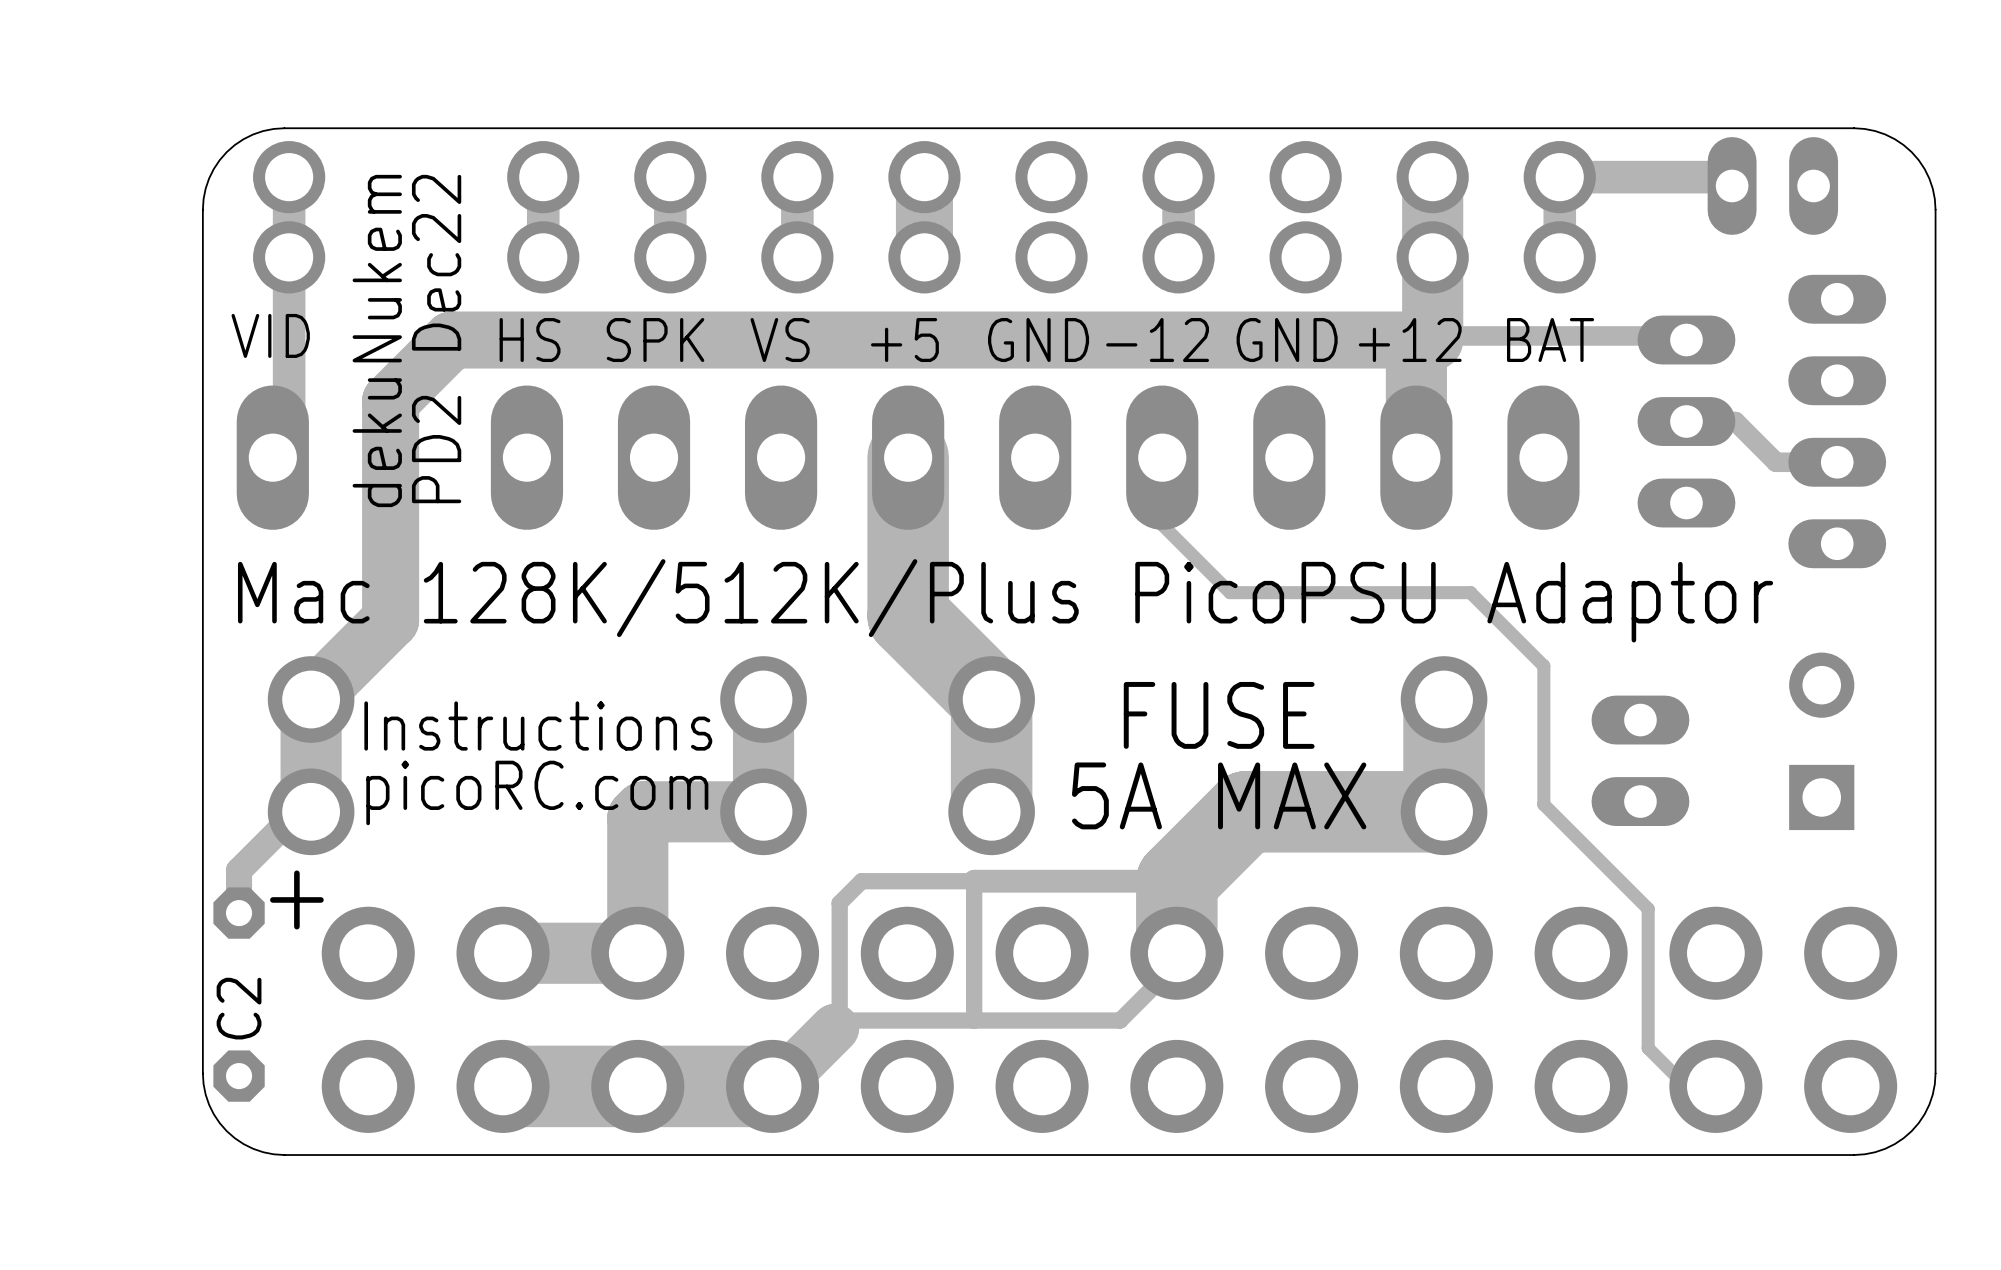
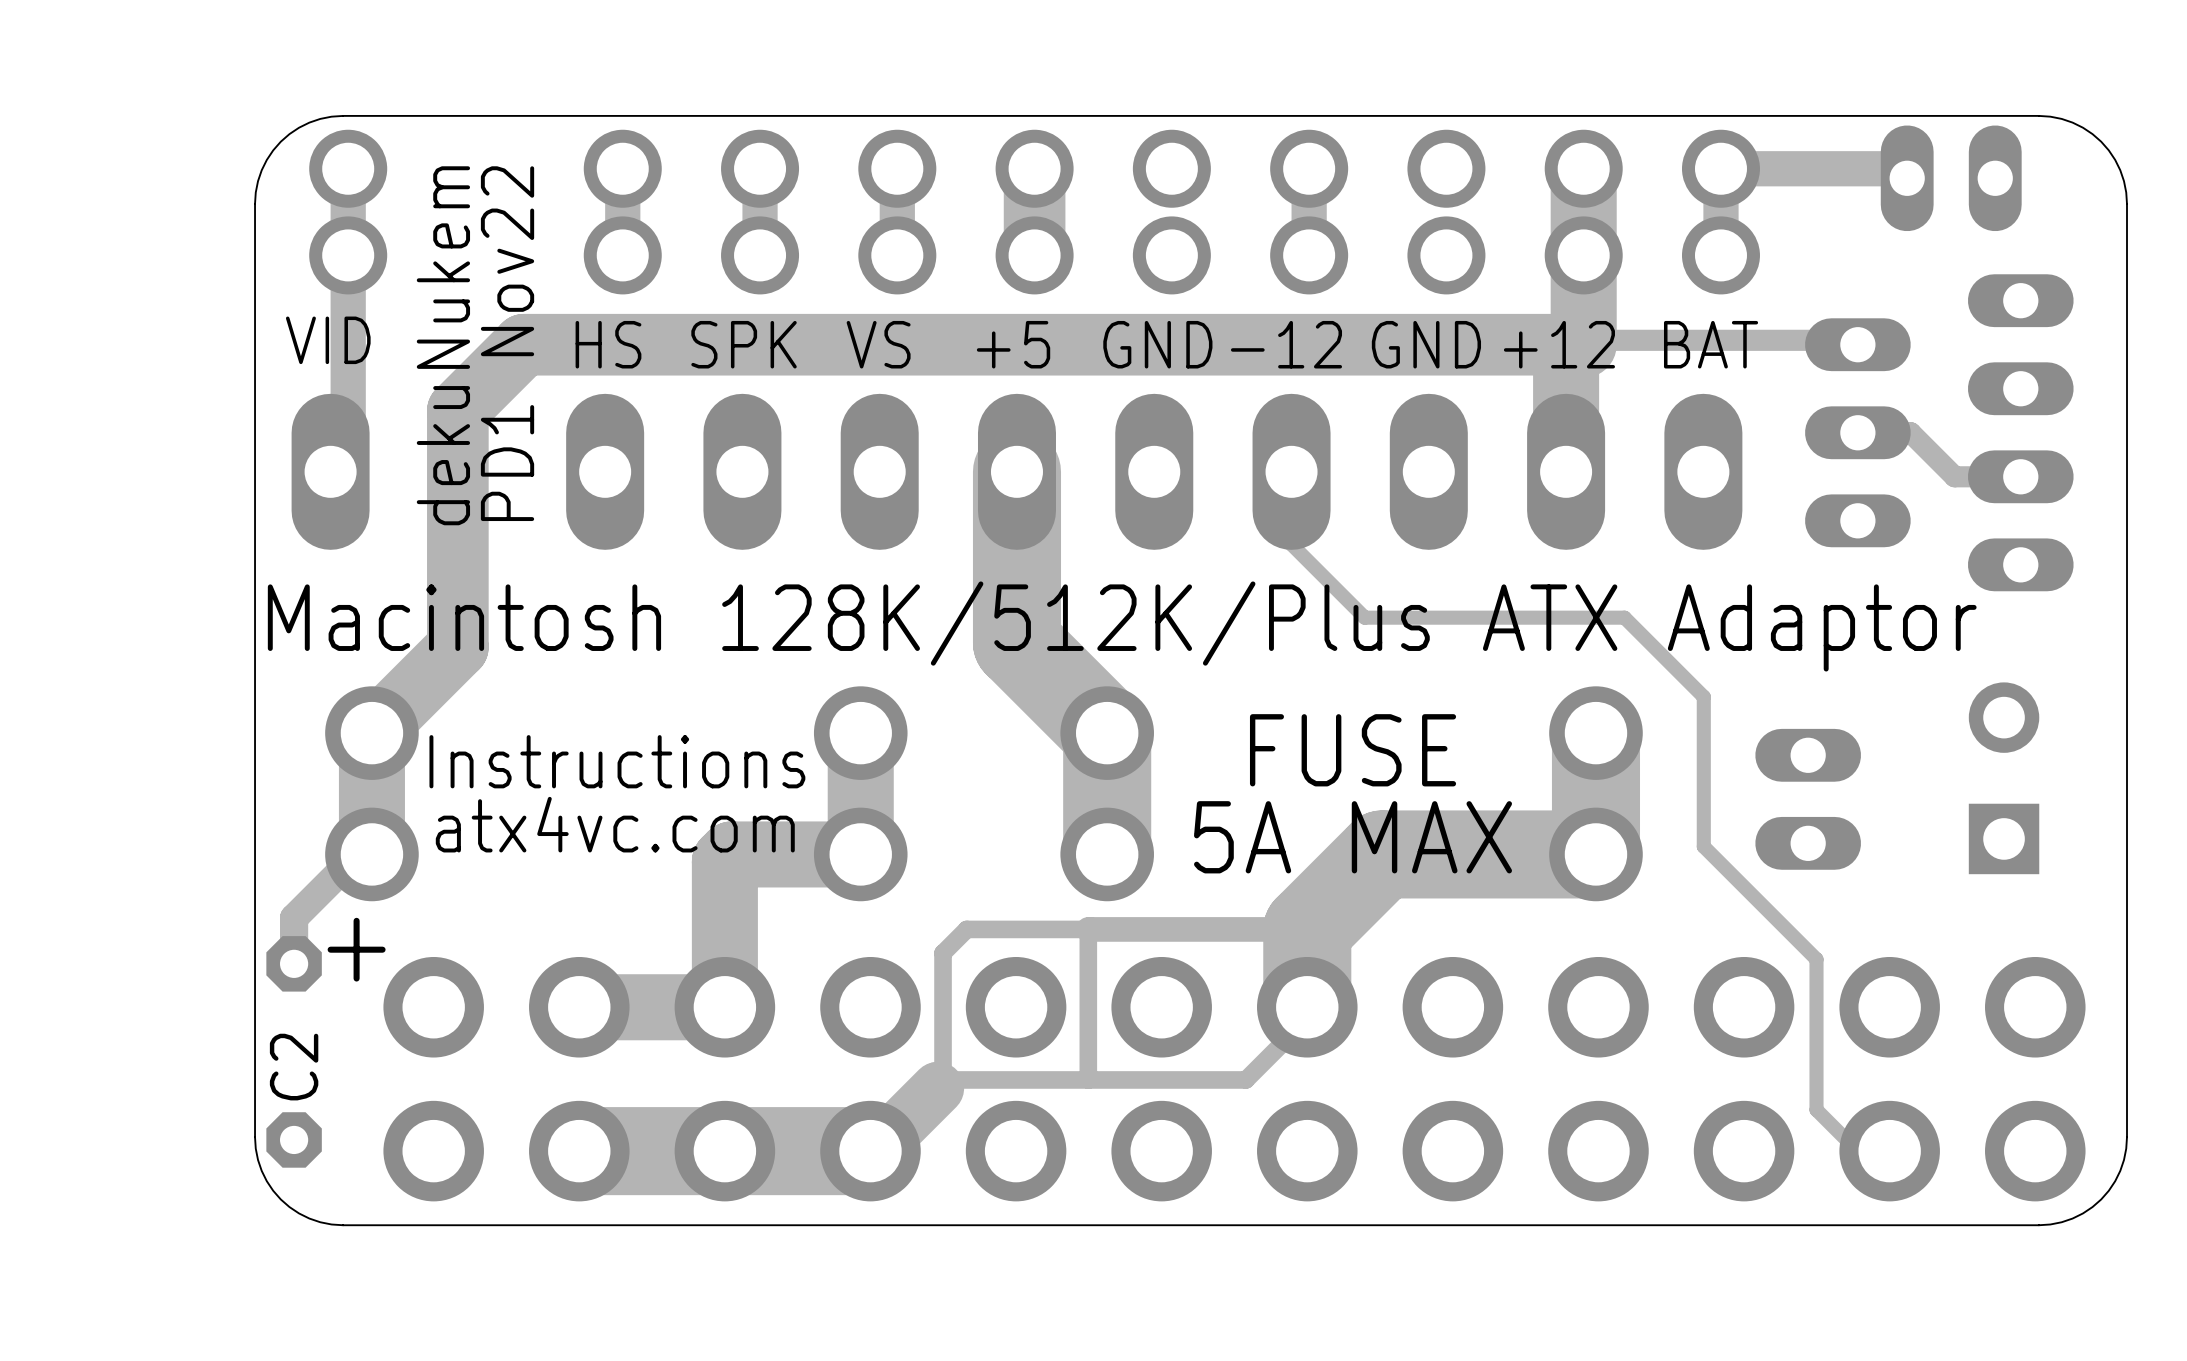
text: PD2 Dec22 (436, 339) -> PD1 Nov22 (507, 343)
text: Mac 128K/512K/Plus PicoPSU Adaptor (1005, 600) -> Macintosh 128K/512K/Plus ATX Adaptor (1122, 626)
text: picoRC.com (537, 792) -> atx4vc.com (615, 824)

